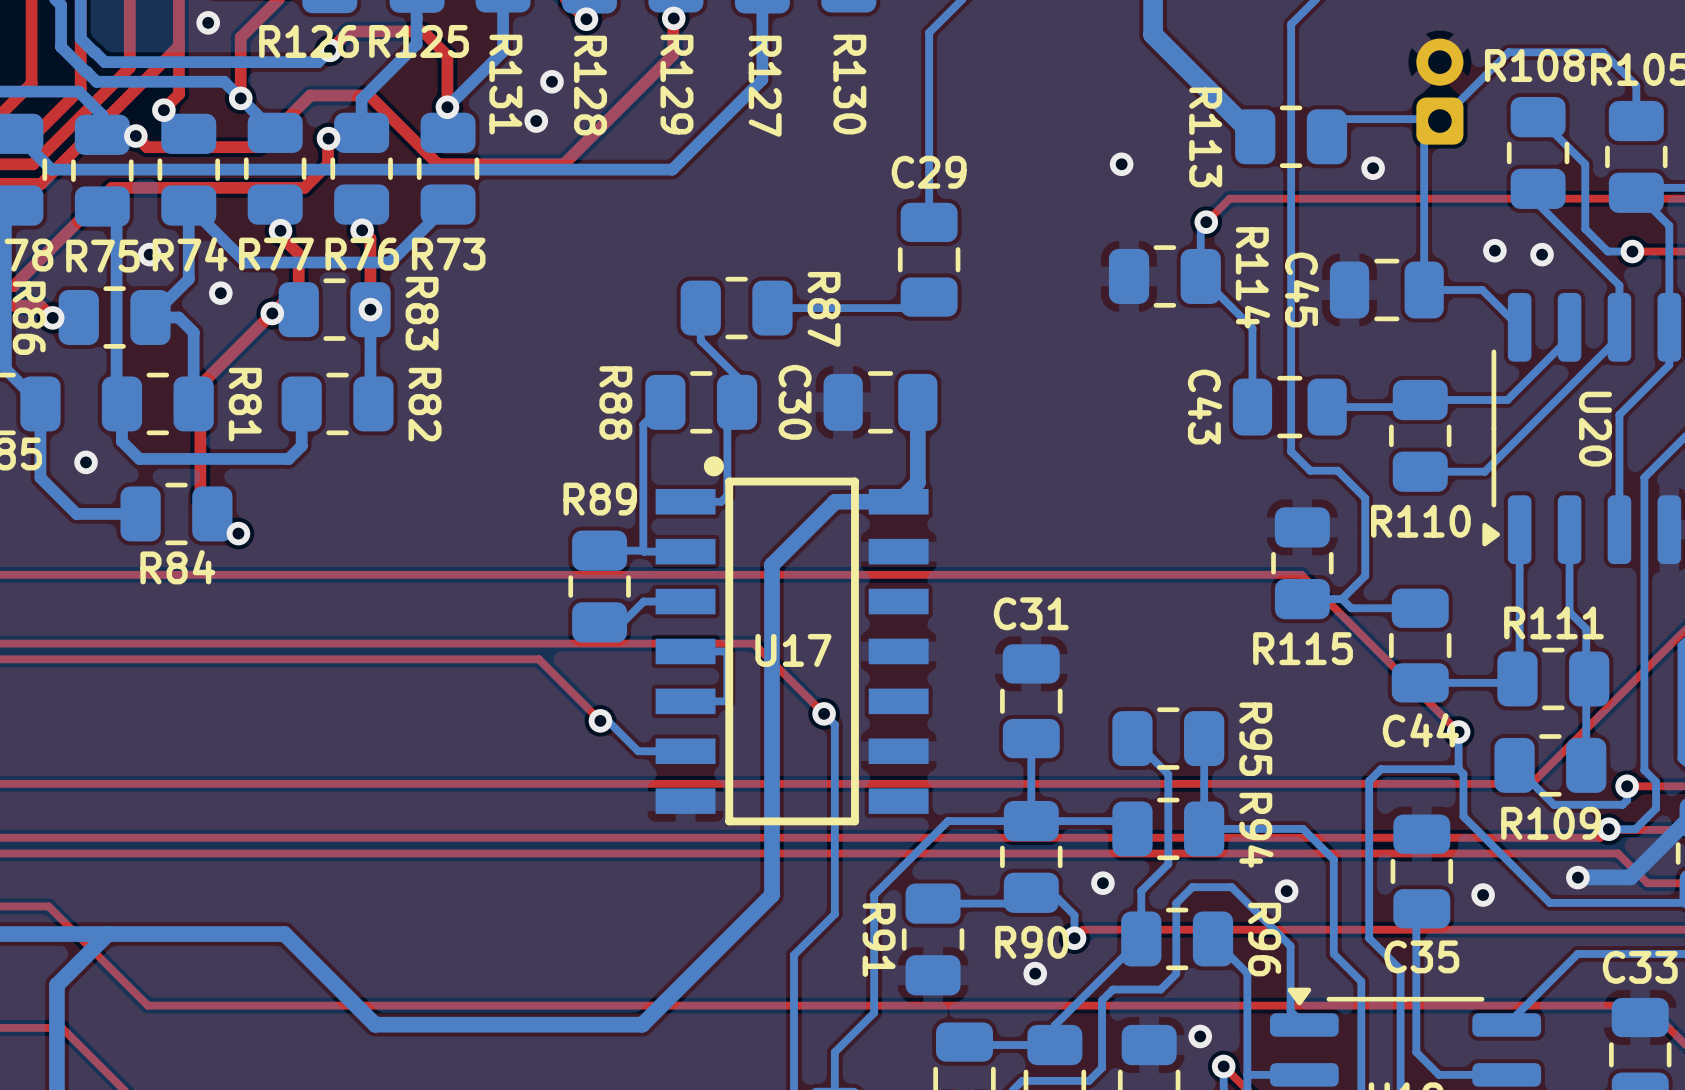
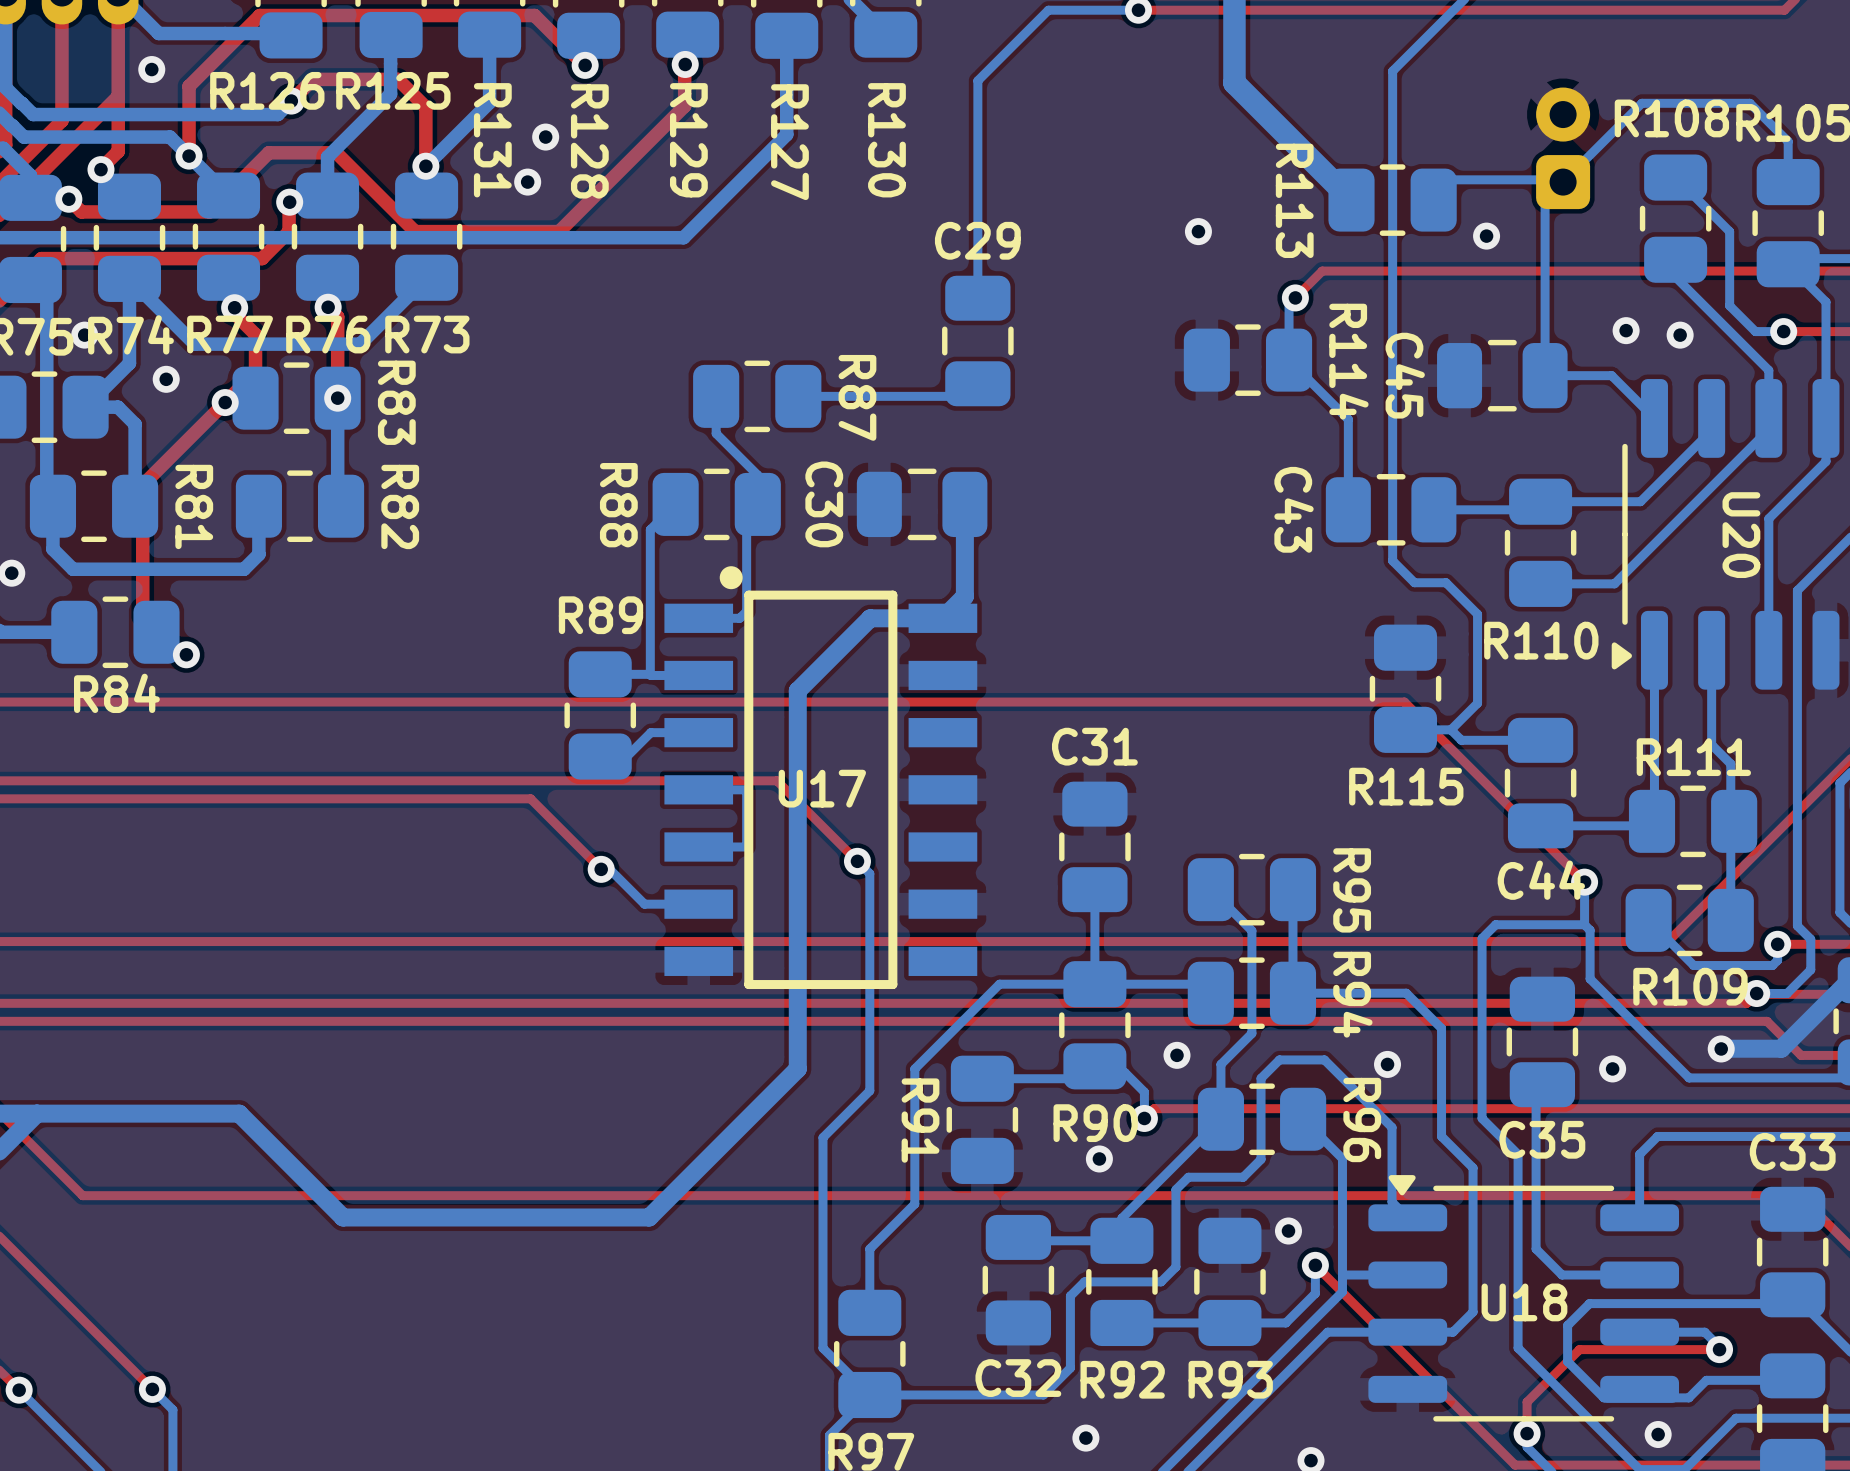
bottom track: (1577, 953) (1506, 1024) -> (1720, 1136) (1657, 1136) (1639, 1154) (1639, 1217)

